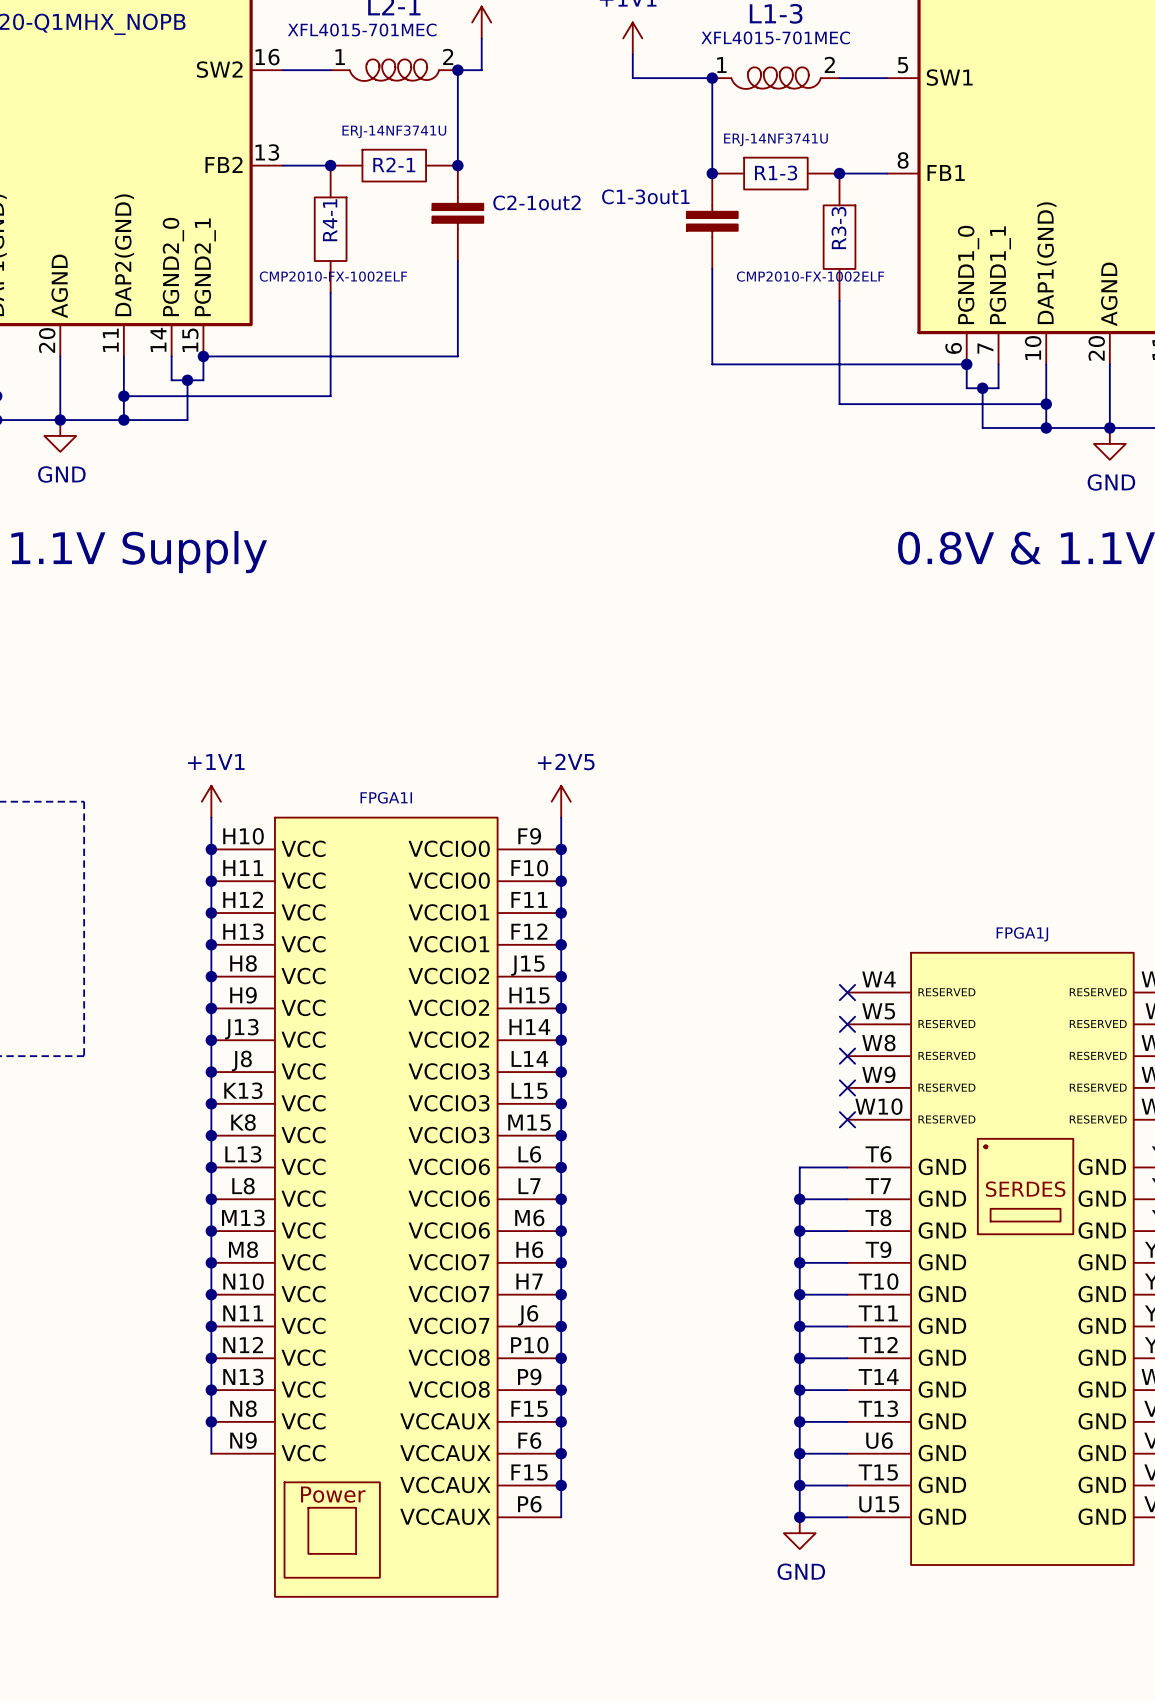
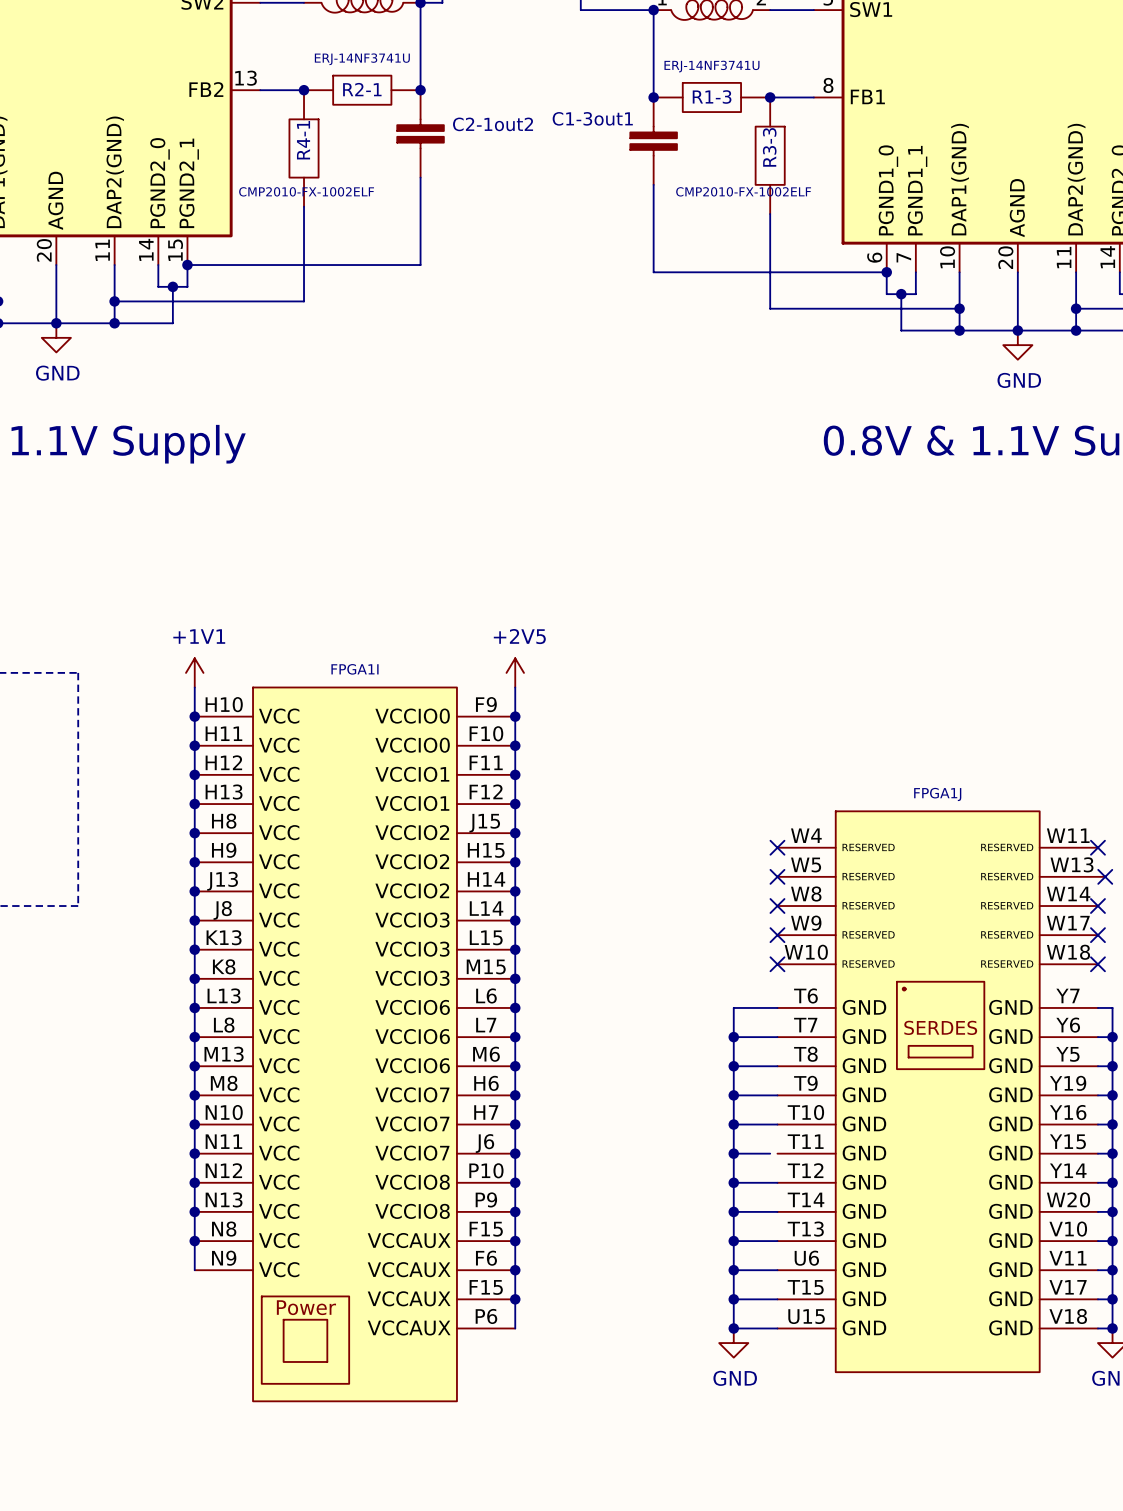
wire: (839, 1326) (847, 1326) -> none

